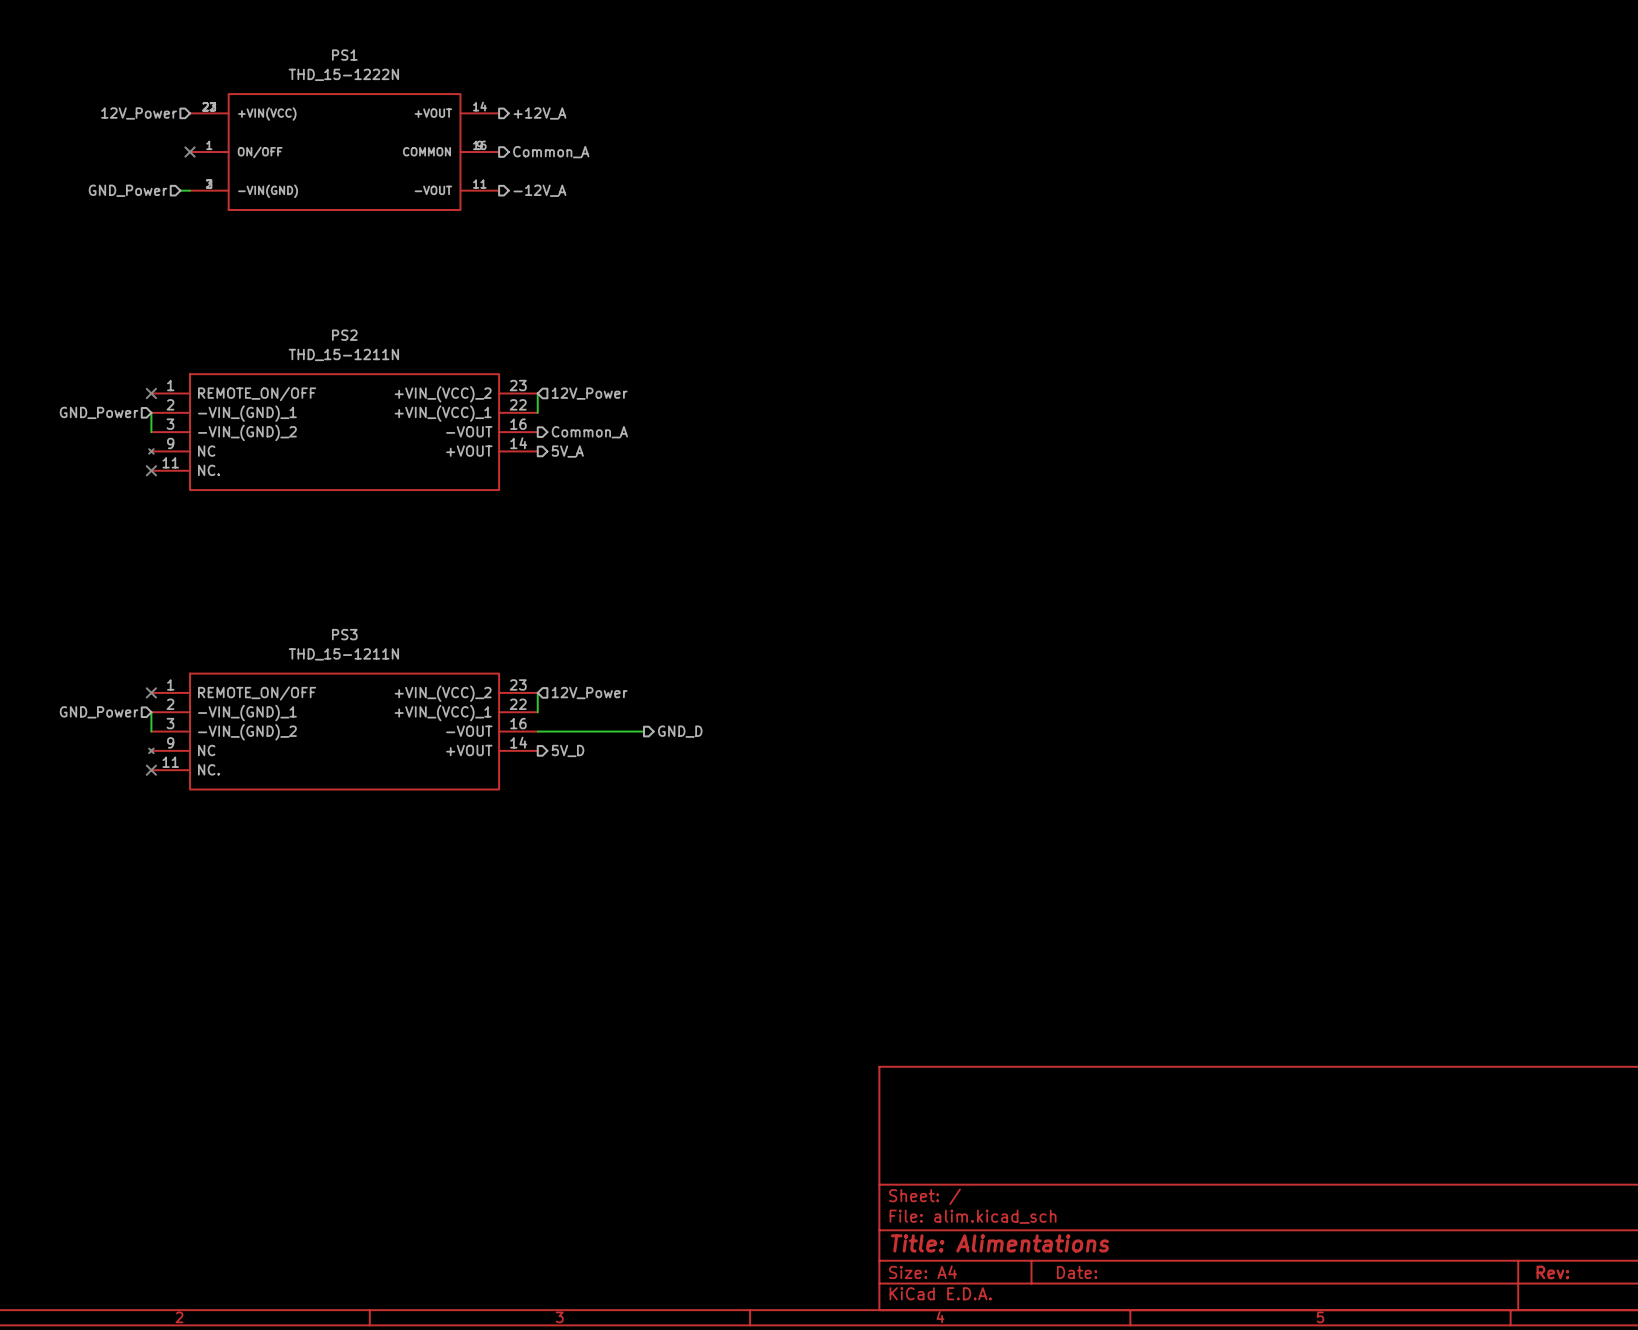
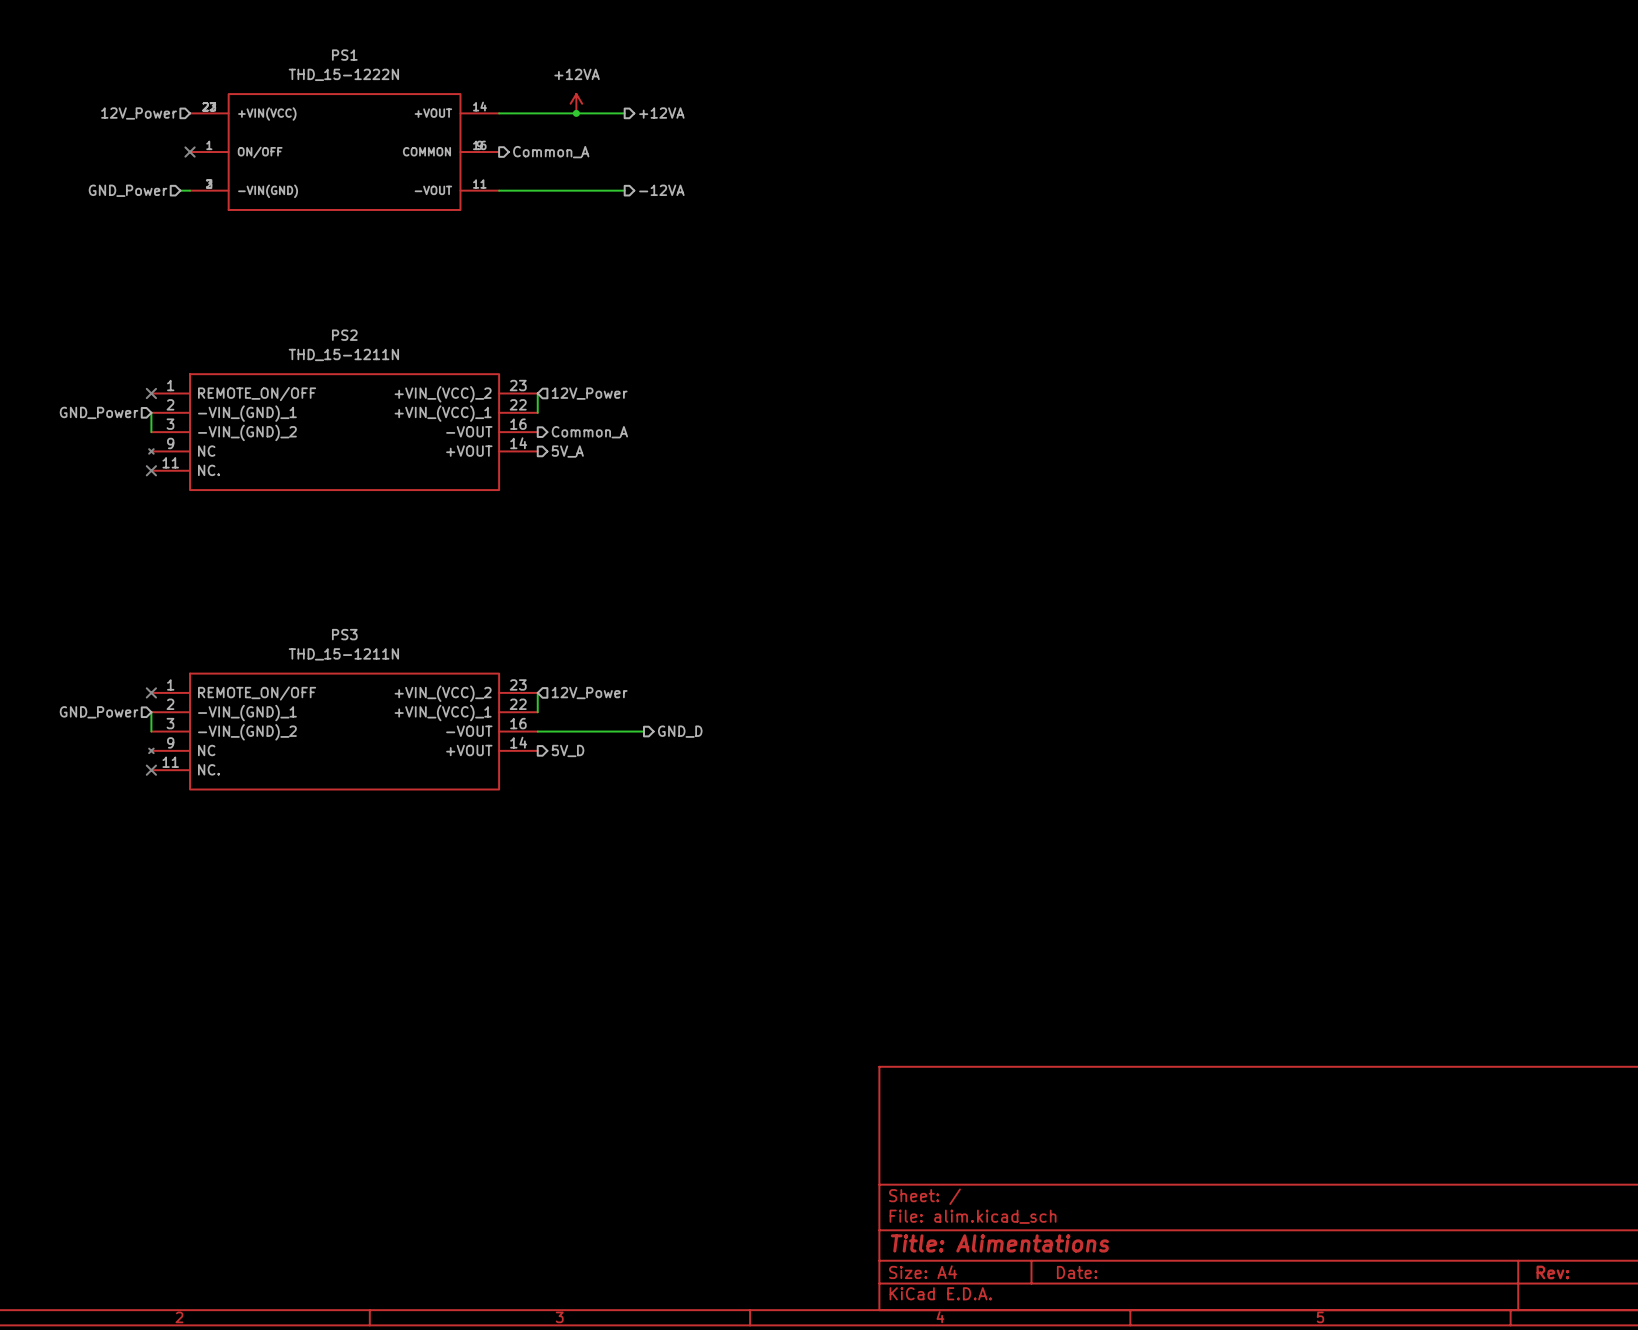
power symbol: none -> +12VA (576, 103)
wire: none -> (499, 113) (624, 113)
hierarchical label: +12V_A (539, 113) -> none
junction: none -> (576, 113)
hierarchical label: none -> +12VA (661, 113)
wire: none -> (499, 190) (624, 190)
hierarchical label: -12V_A (539, 190) -> none
hierarchical label: none -> -12VA (661, 190)

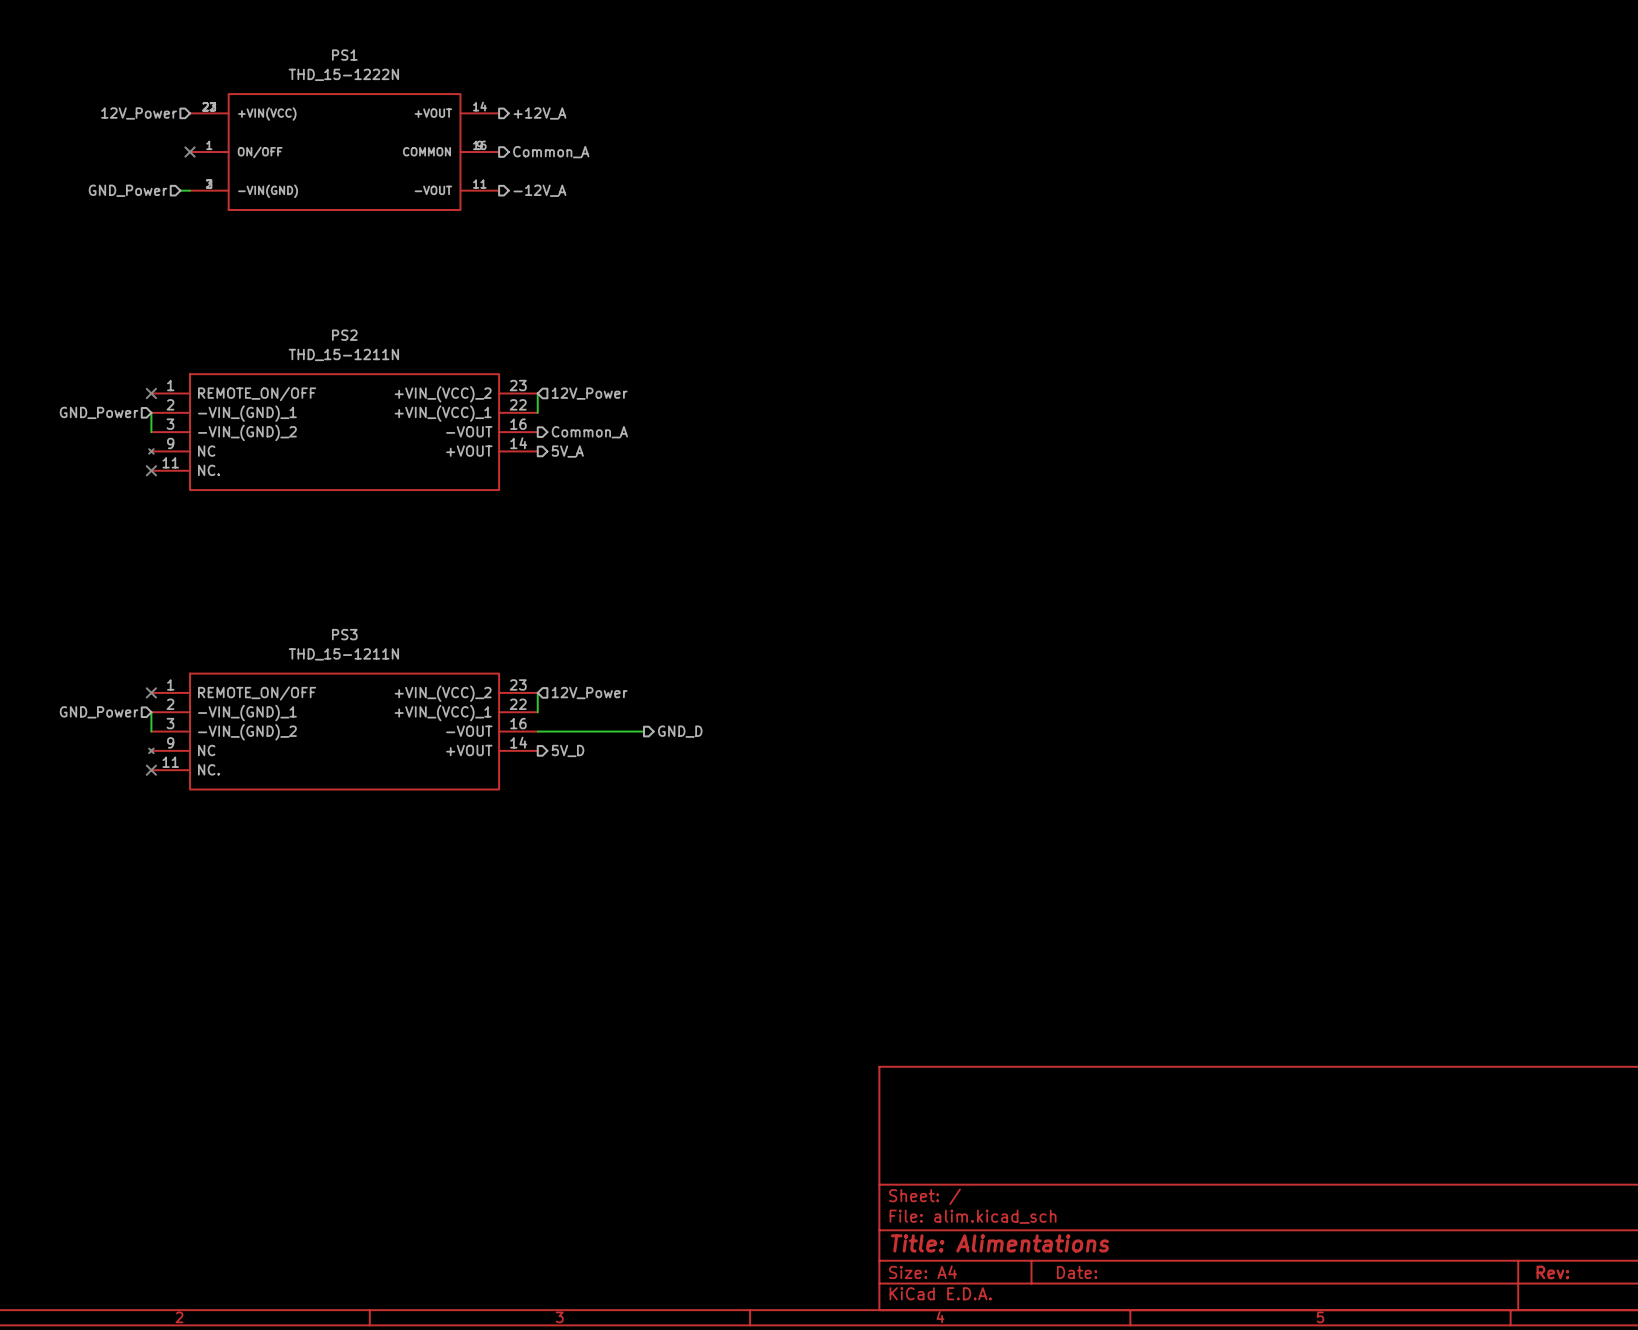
power symbol: +12VA (576, 103) -> none
wire: (499, 113) (624, 113) -> none
hierarchical label: none -> +12V_A (539, 113)
junction: (576, 113) -> none
hierarchical label: +12VA (661, 113) -> none
wire: (499, 190) (624, 190) -> none
hierarchical label: none -> -12V_A (539, 190)
hierarchical label: -12VA (661, 190) -> none

